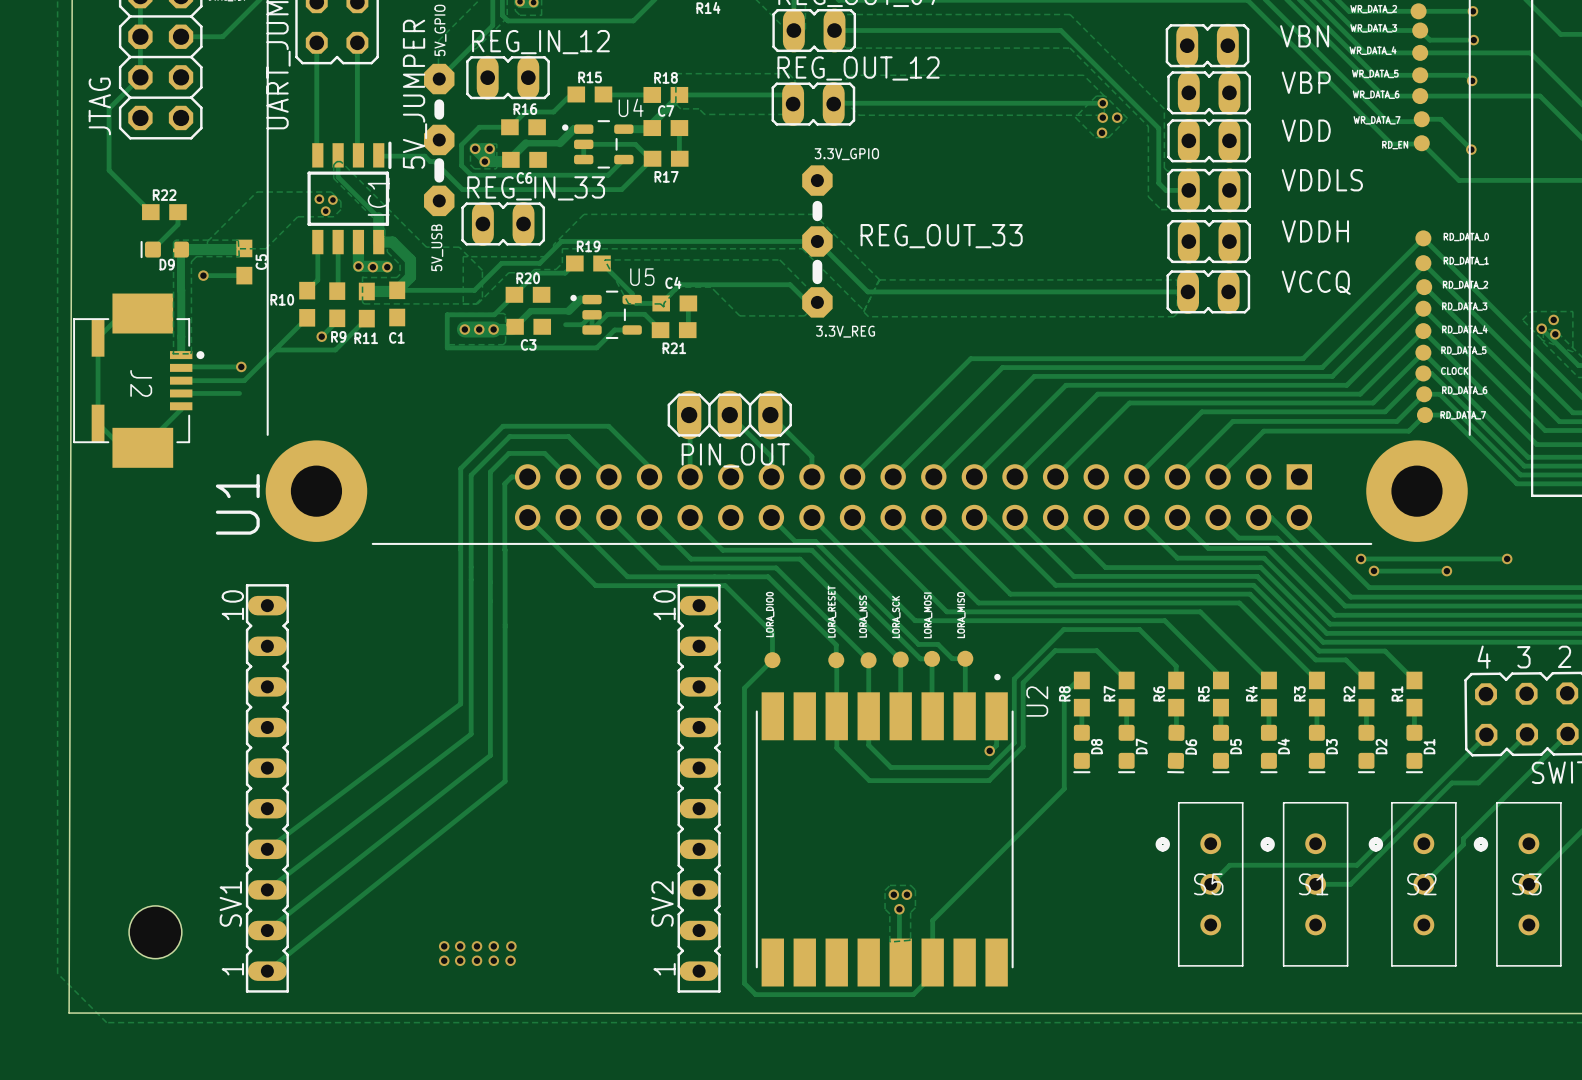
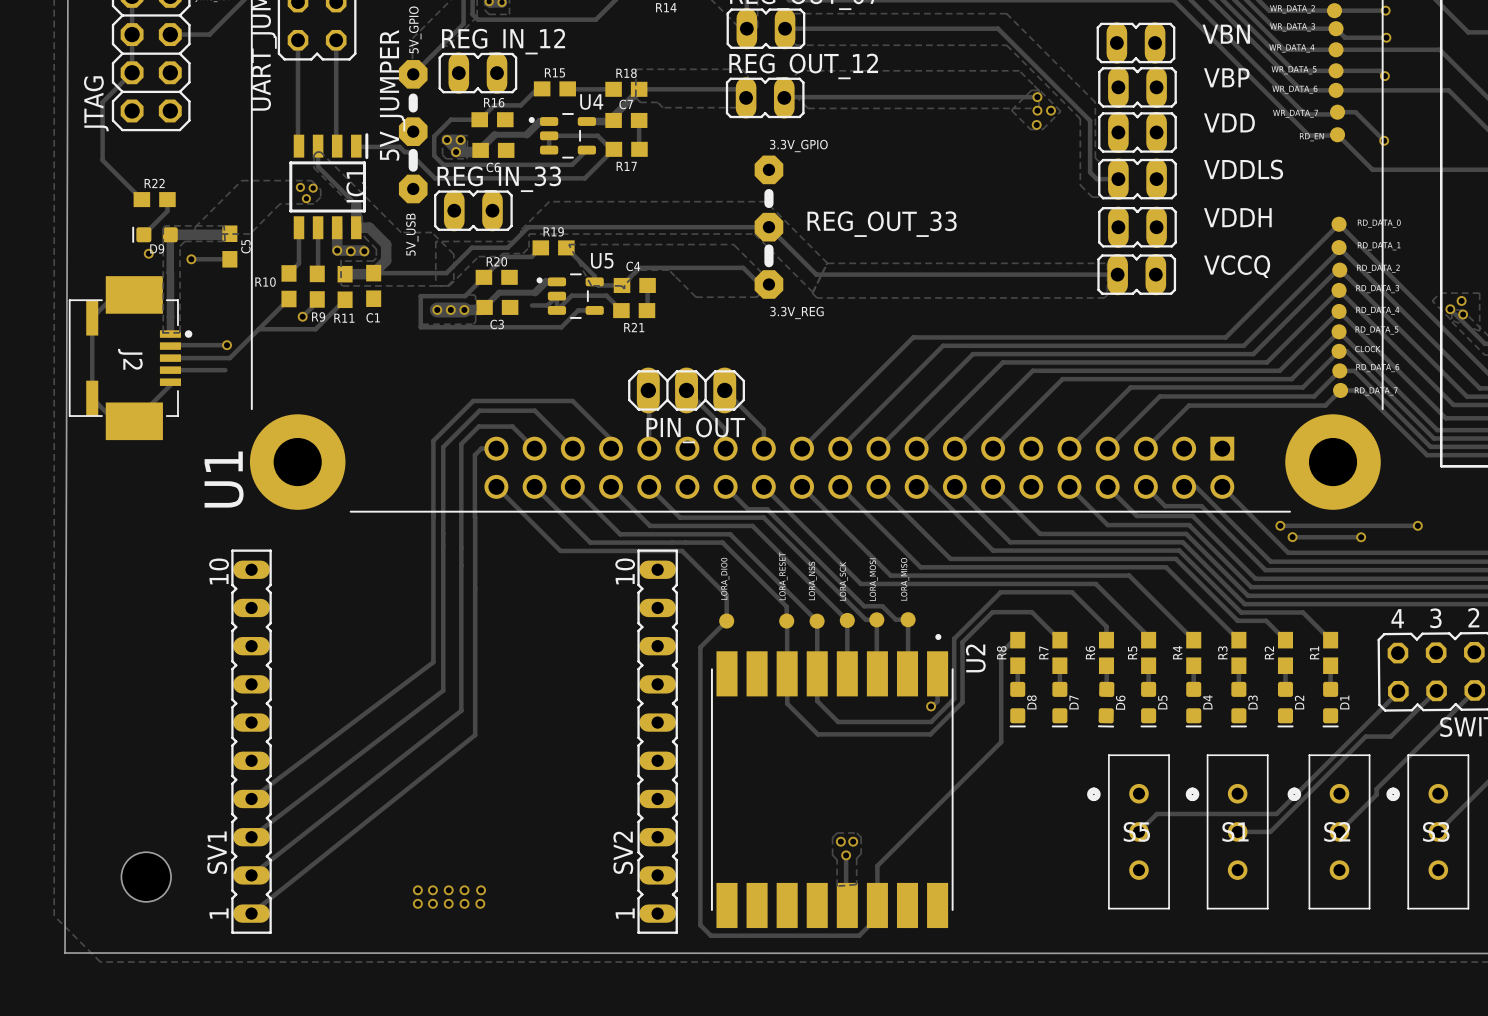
via: none -> (148, 253)

